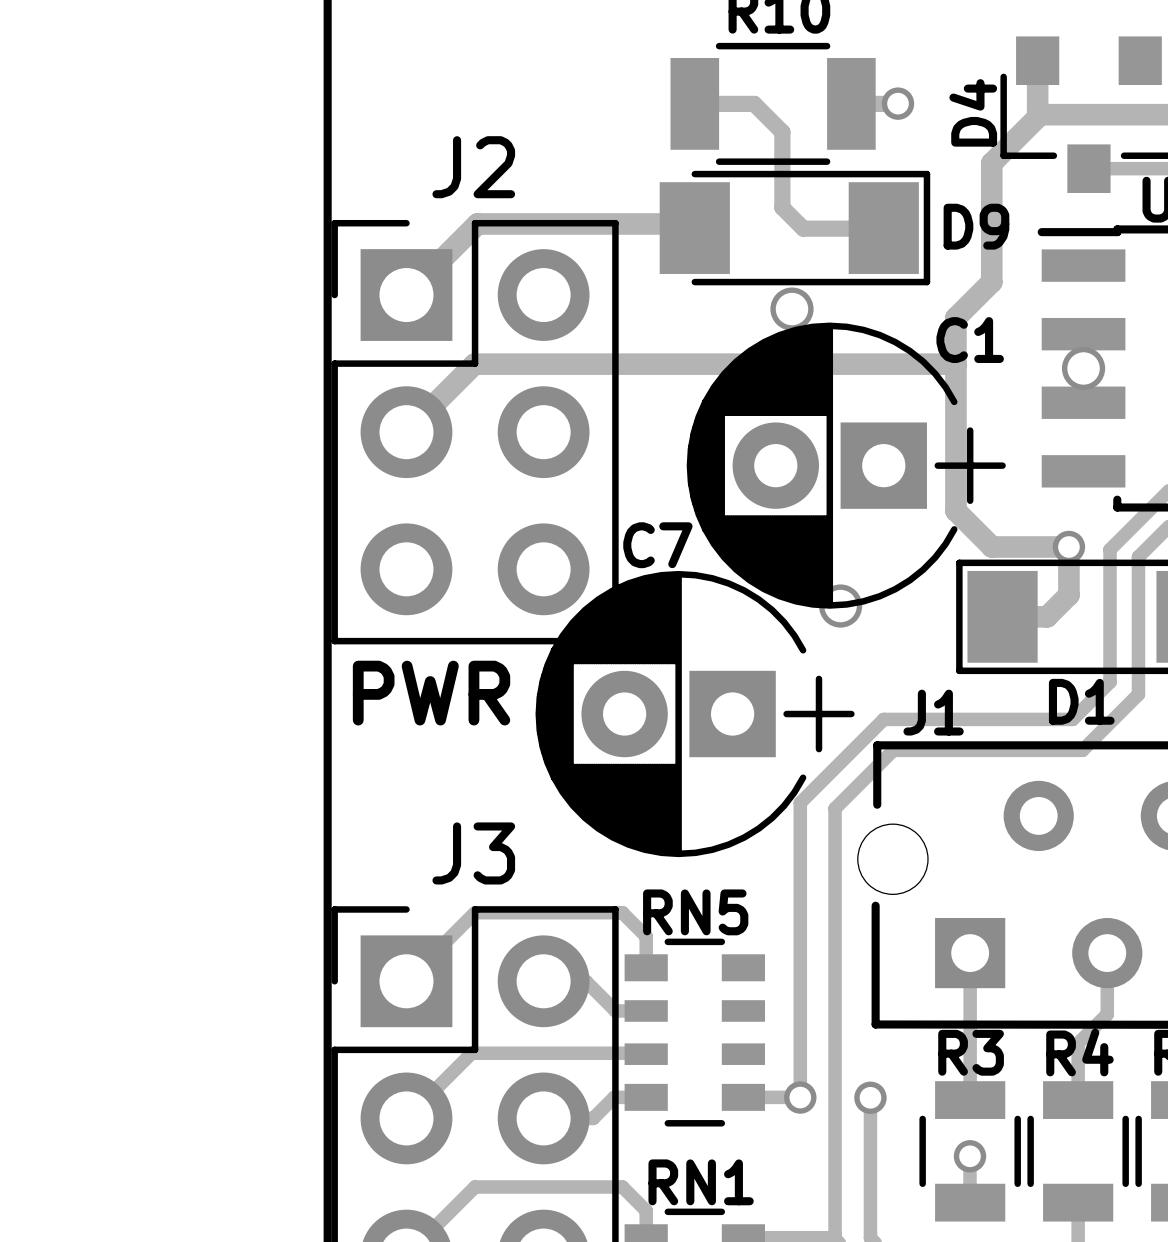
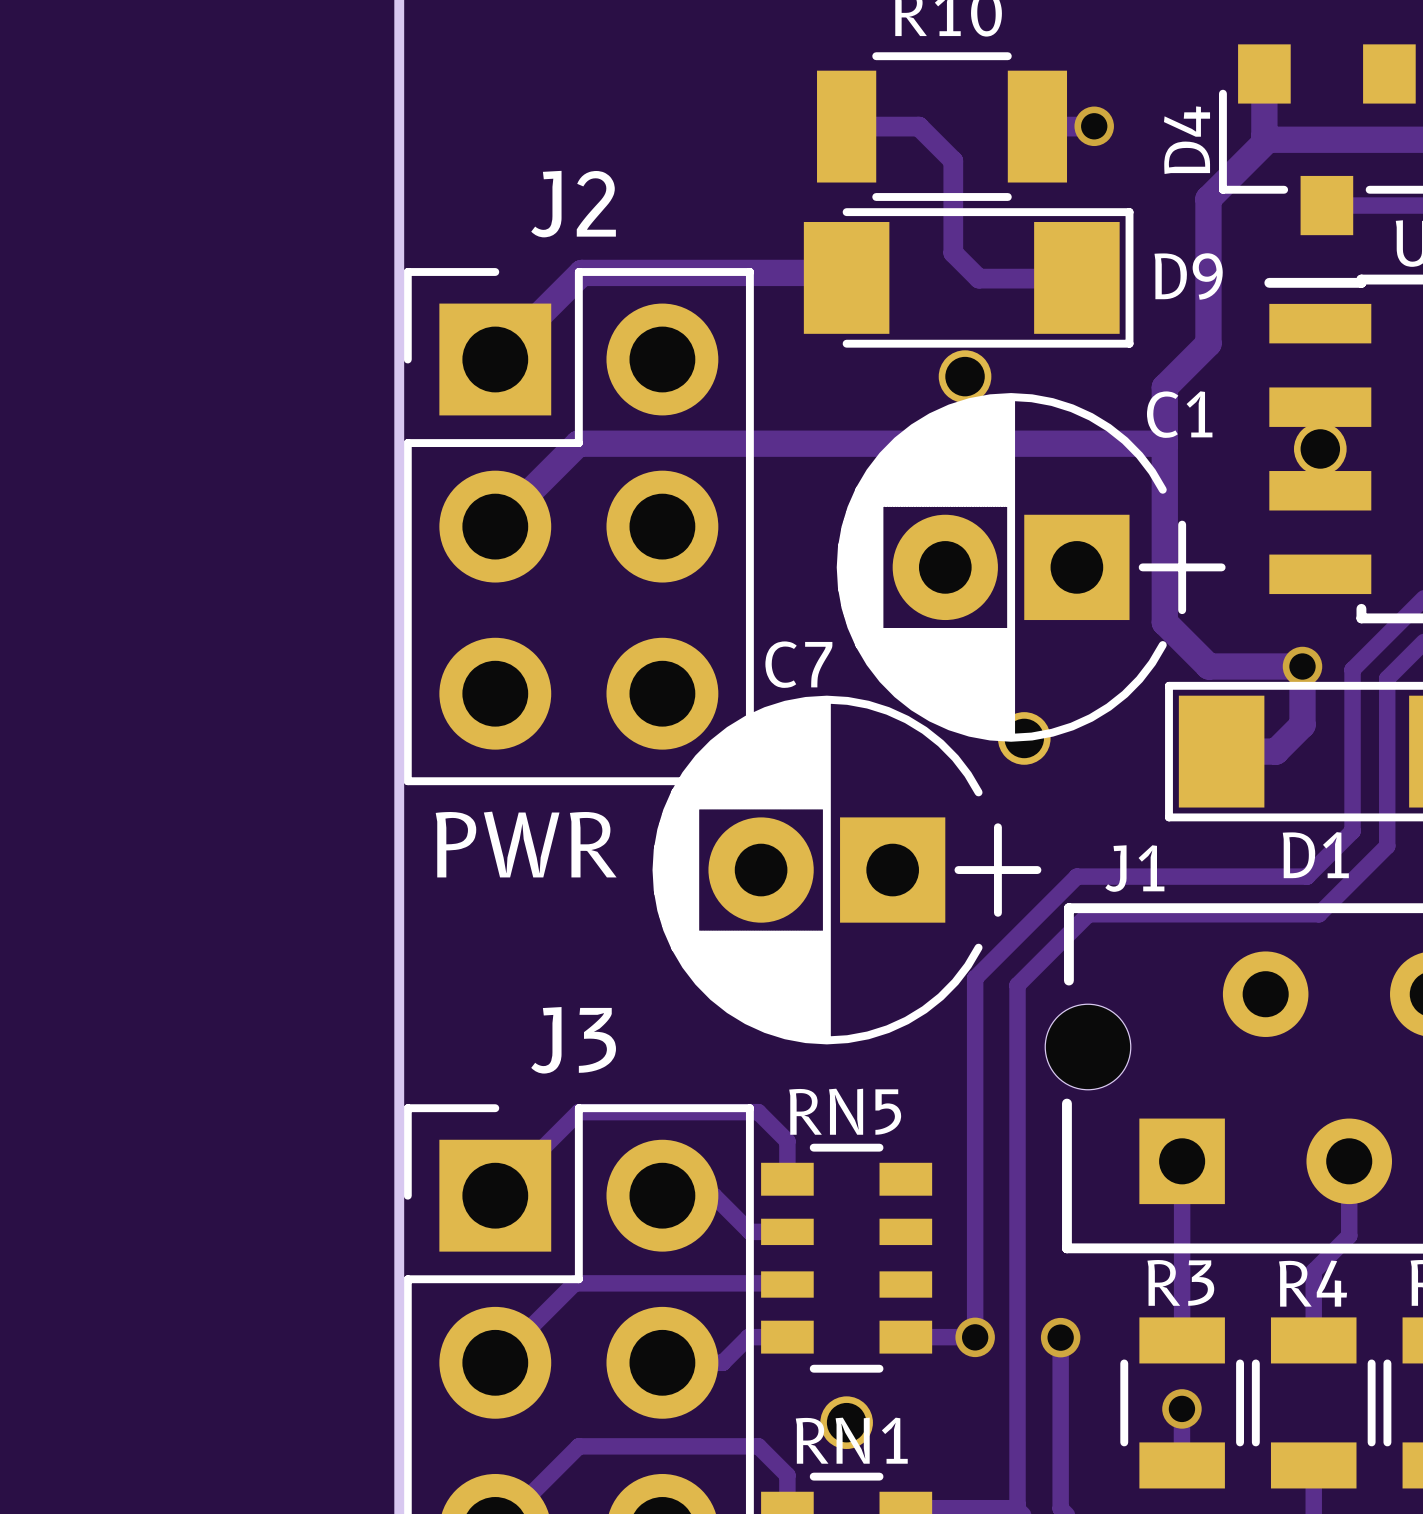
part: none -> (846, 1422)

